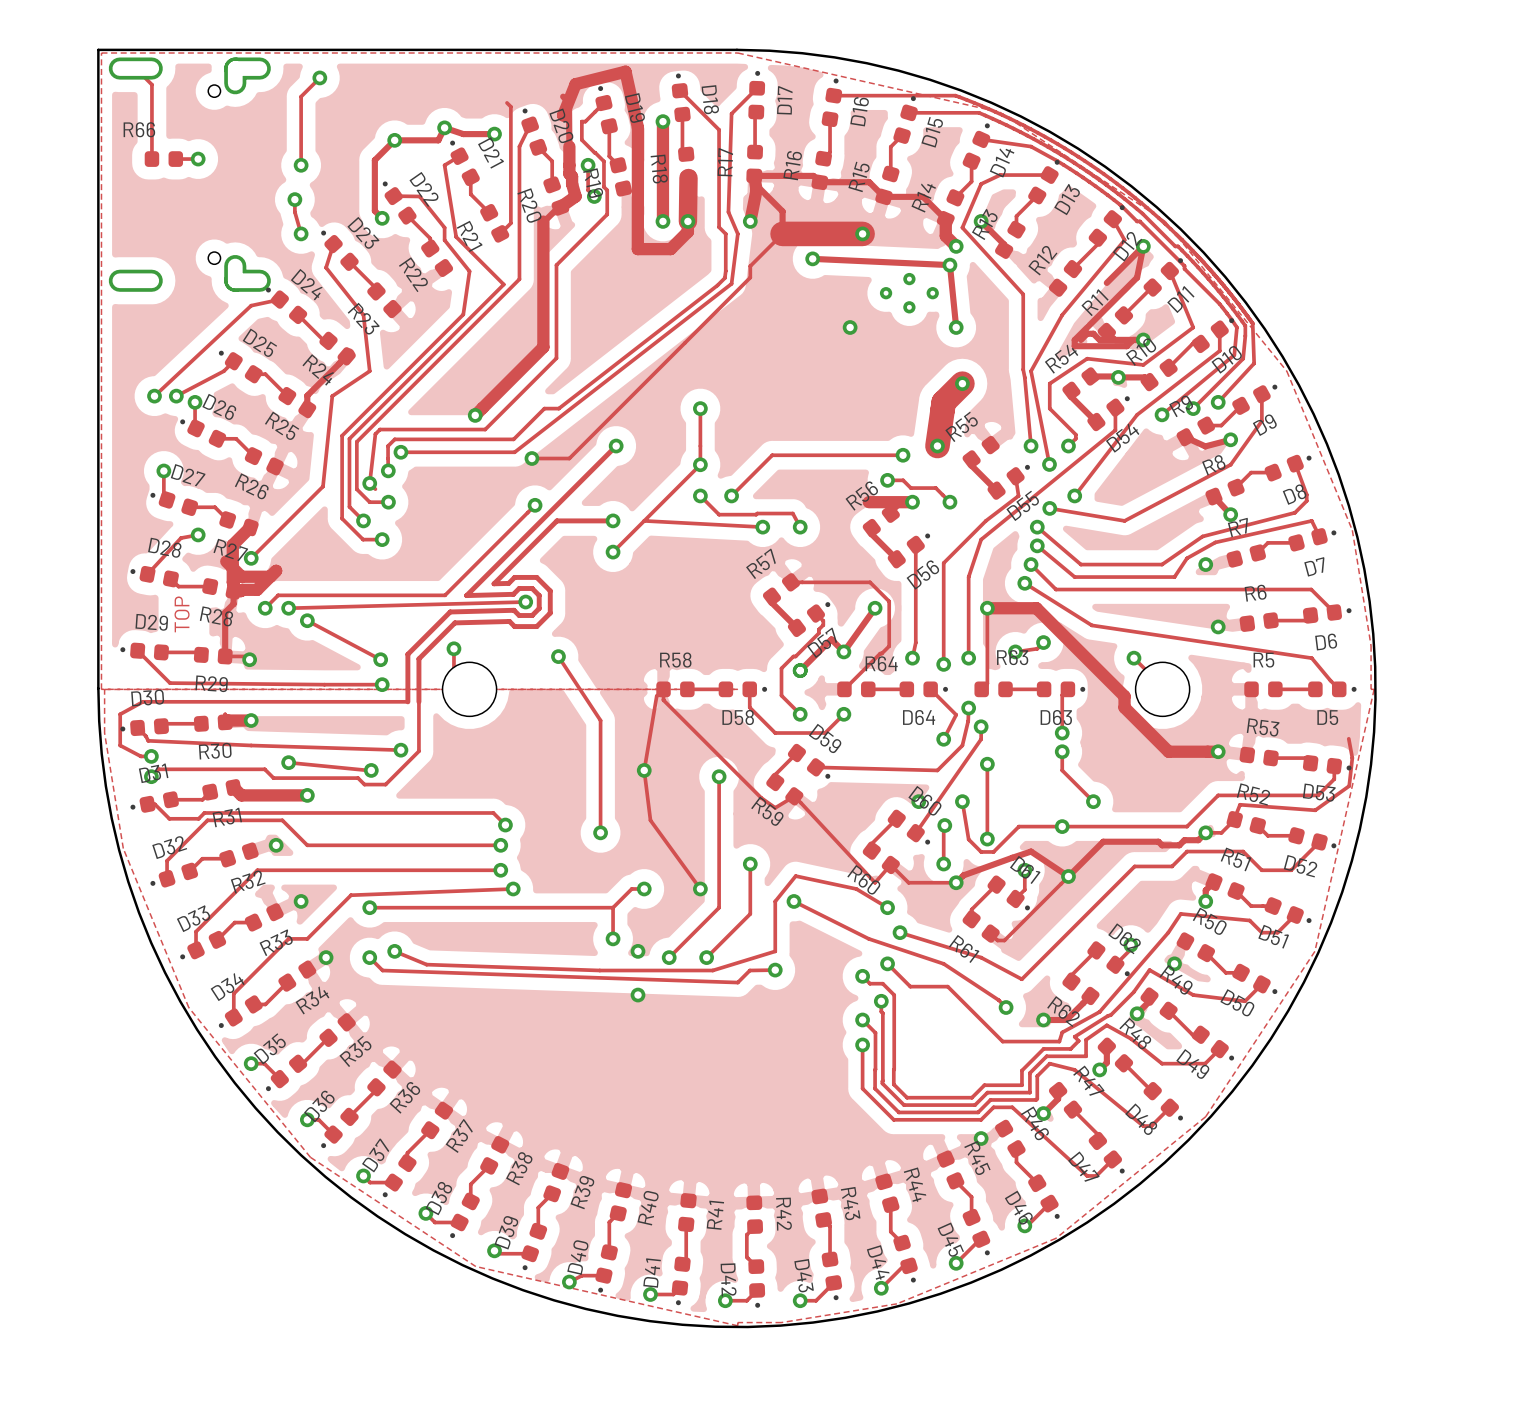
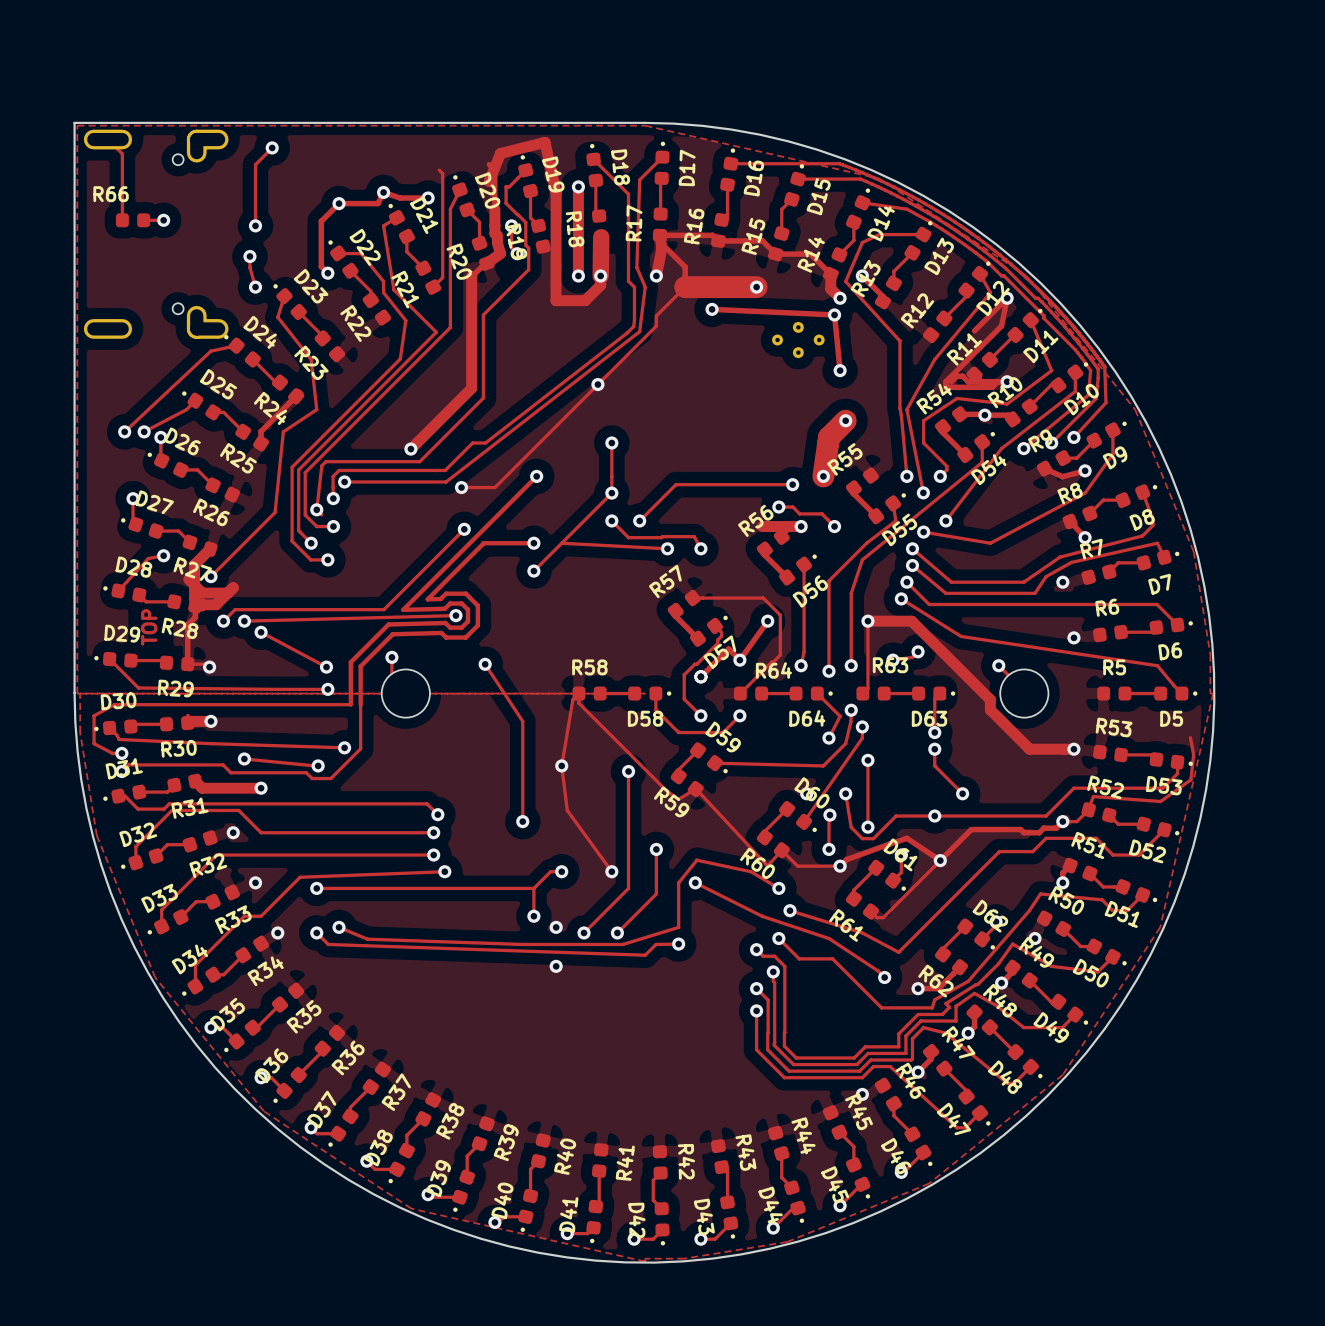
via: (850, 327) -> none
via: none -> (597, 384)

